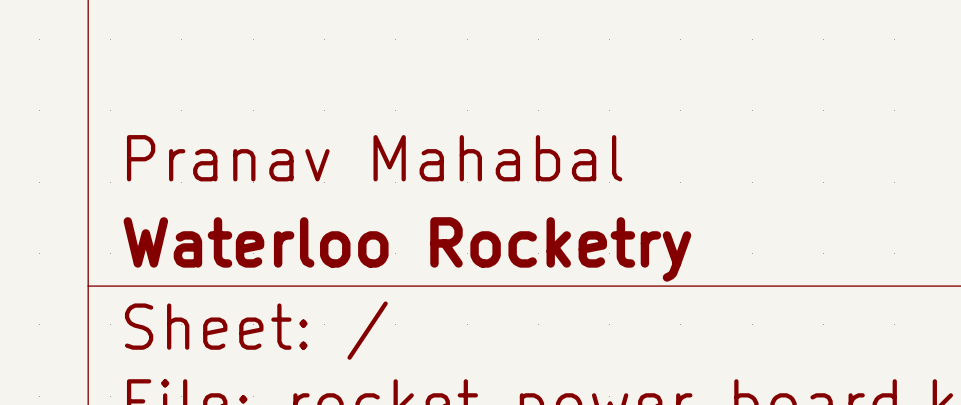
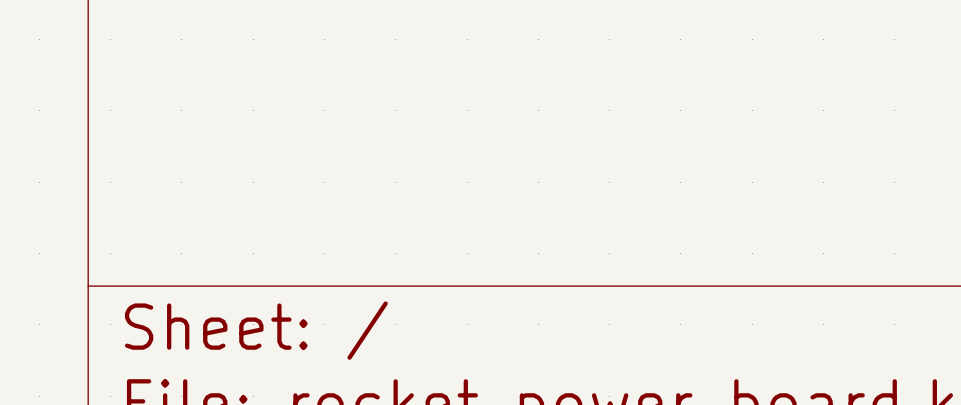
title block: Pranav Mahabal (374, 158) -> none
title block: Waterloo Rocketry (407, 249) -> none

